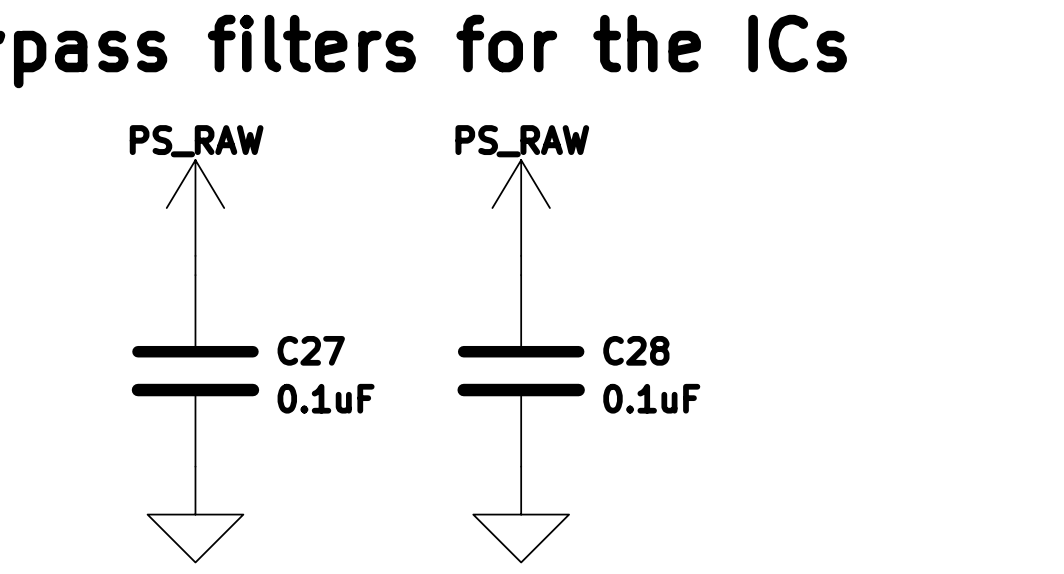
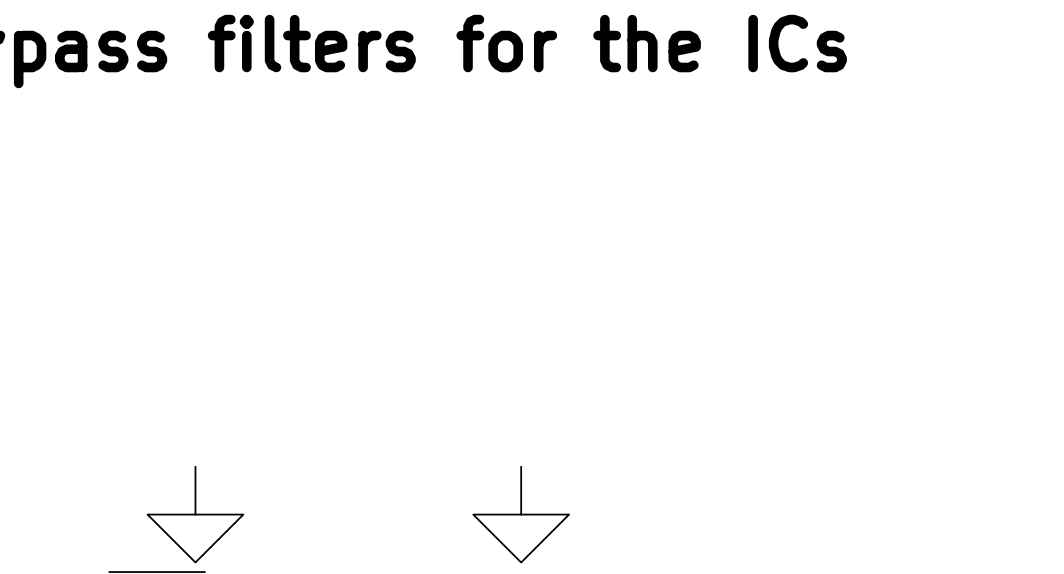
power symbol: PS_RAW (195, 208) -> none
power symbol: PS_RAW (521, 208) -> none
wire: (195, 255) (195, 275) -> none
wire: (521, 255) (521, 275) -> none
C27: 0.1uF (195, 370) -> none
C28: 0.1uF (521, 370) -> none
wire: none -> (109, 572) (205, 572)

